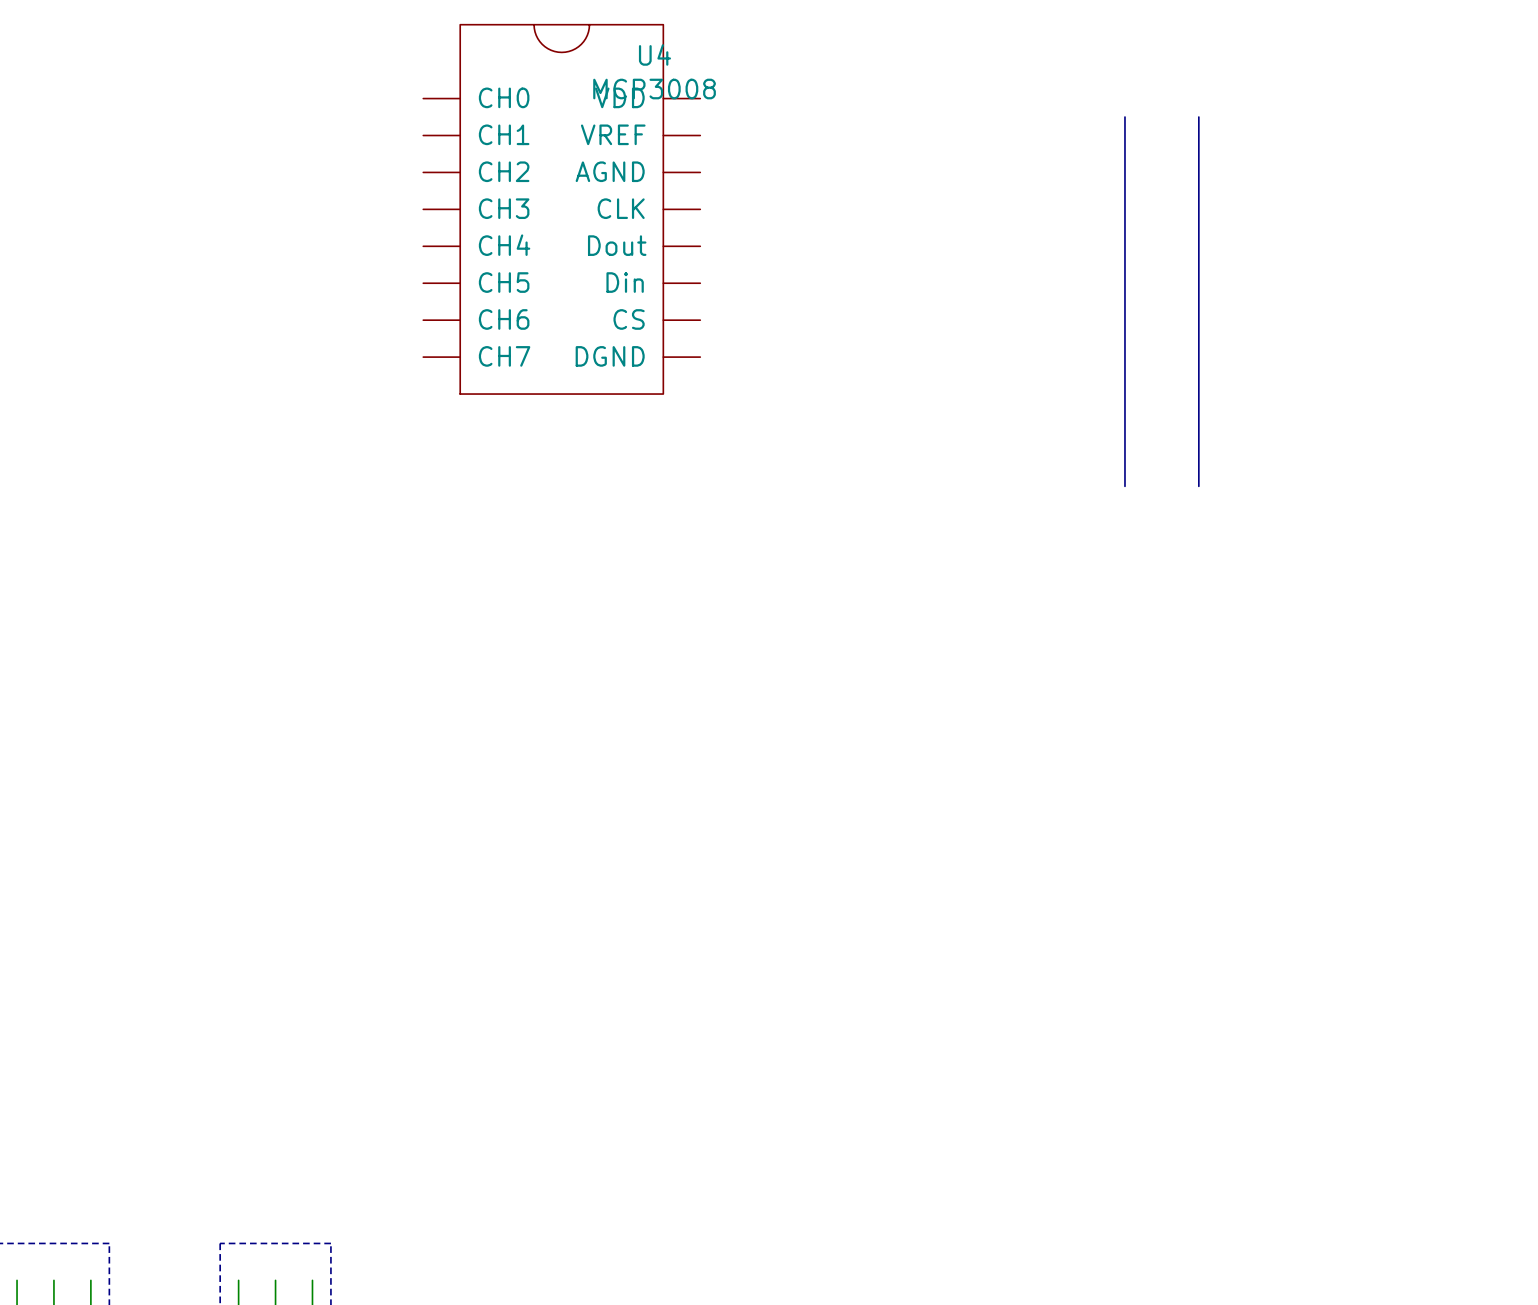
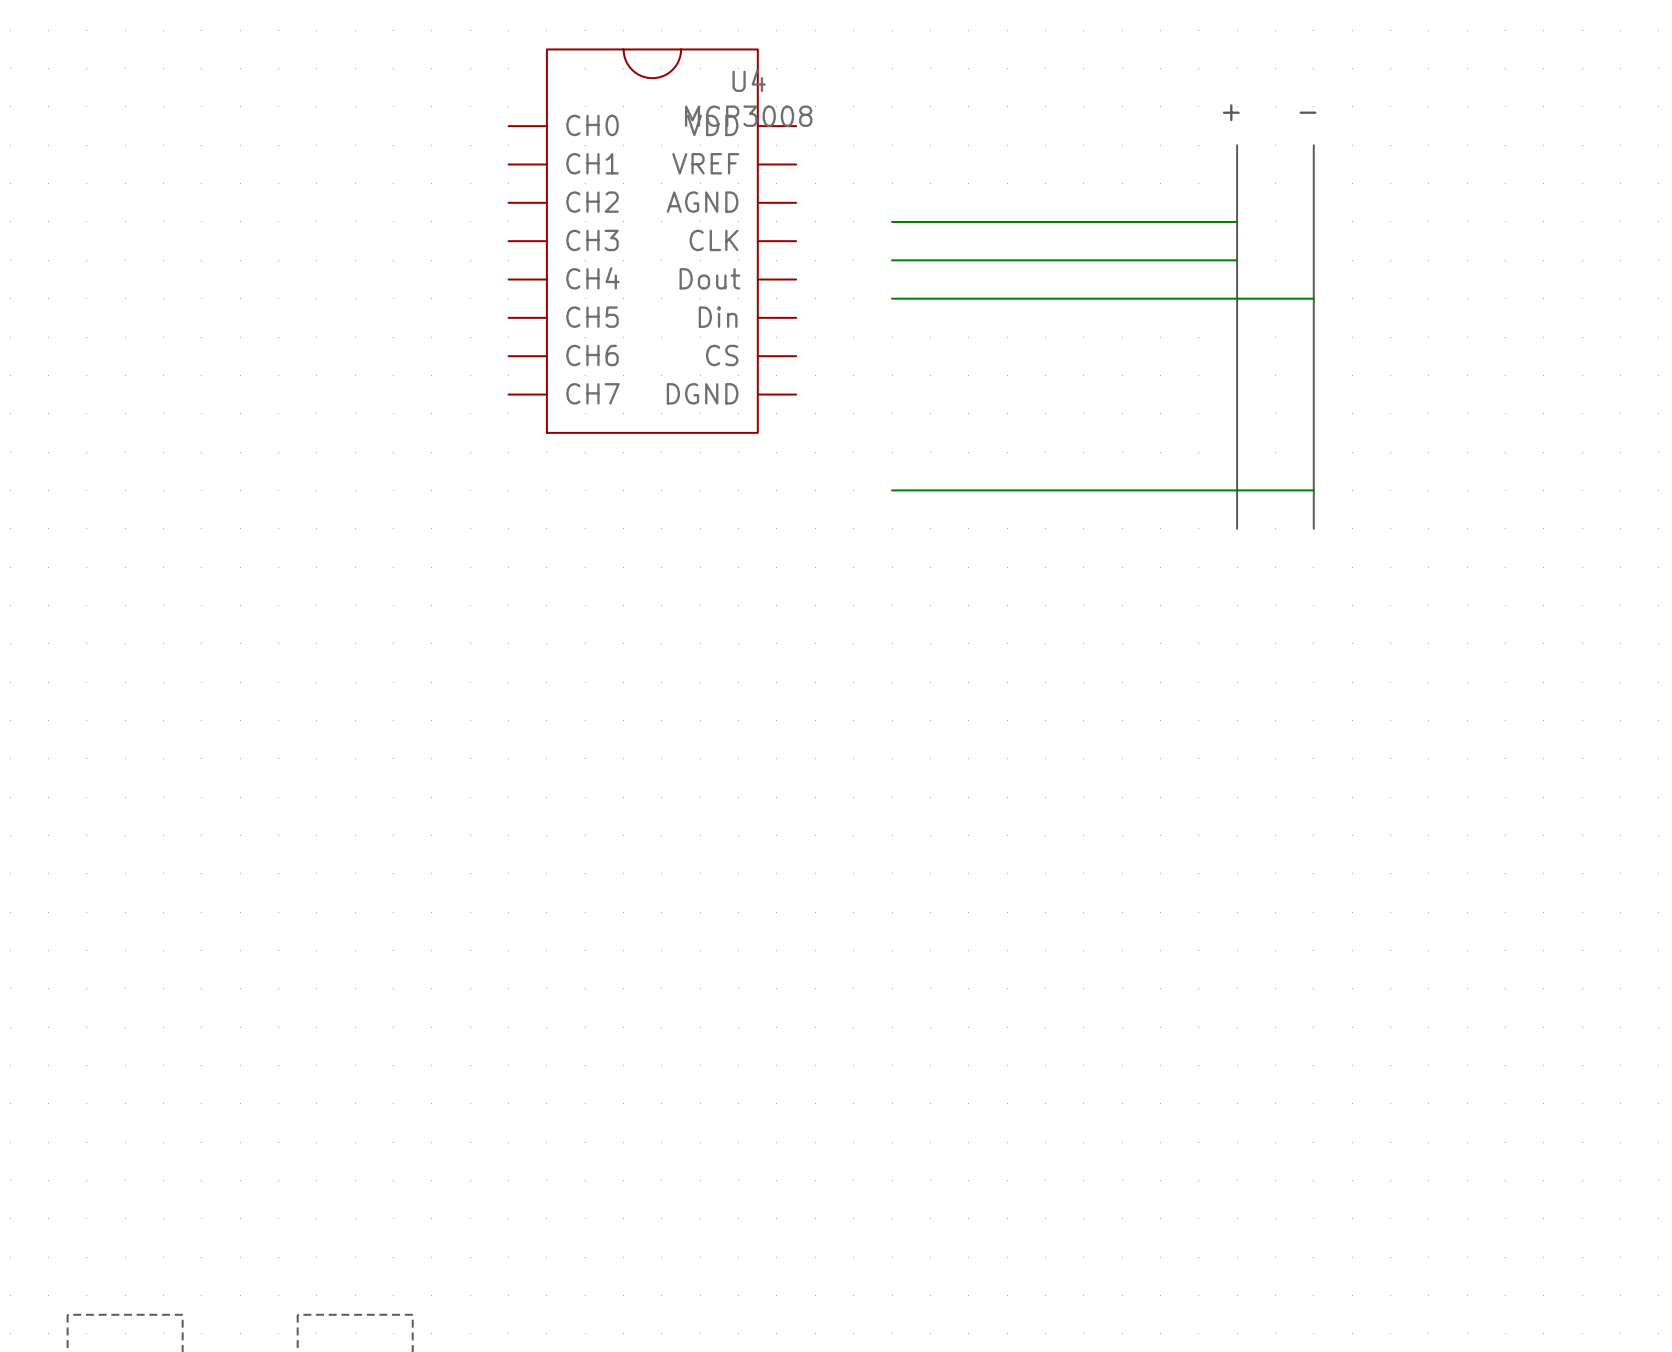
text: none -> + (1231, 112)
text: none -> - (1307, 112)
wire: none -> (892, 221) (1237, 221)
wire: none -> (892, 260) (1237, 260)
wire: none -> (892, 298) (1313, 298)
wire: none -> (892, 490) (1313, 490)

